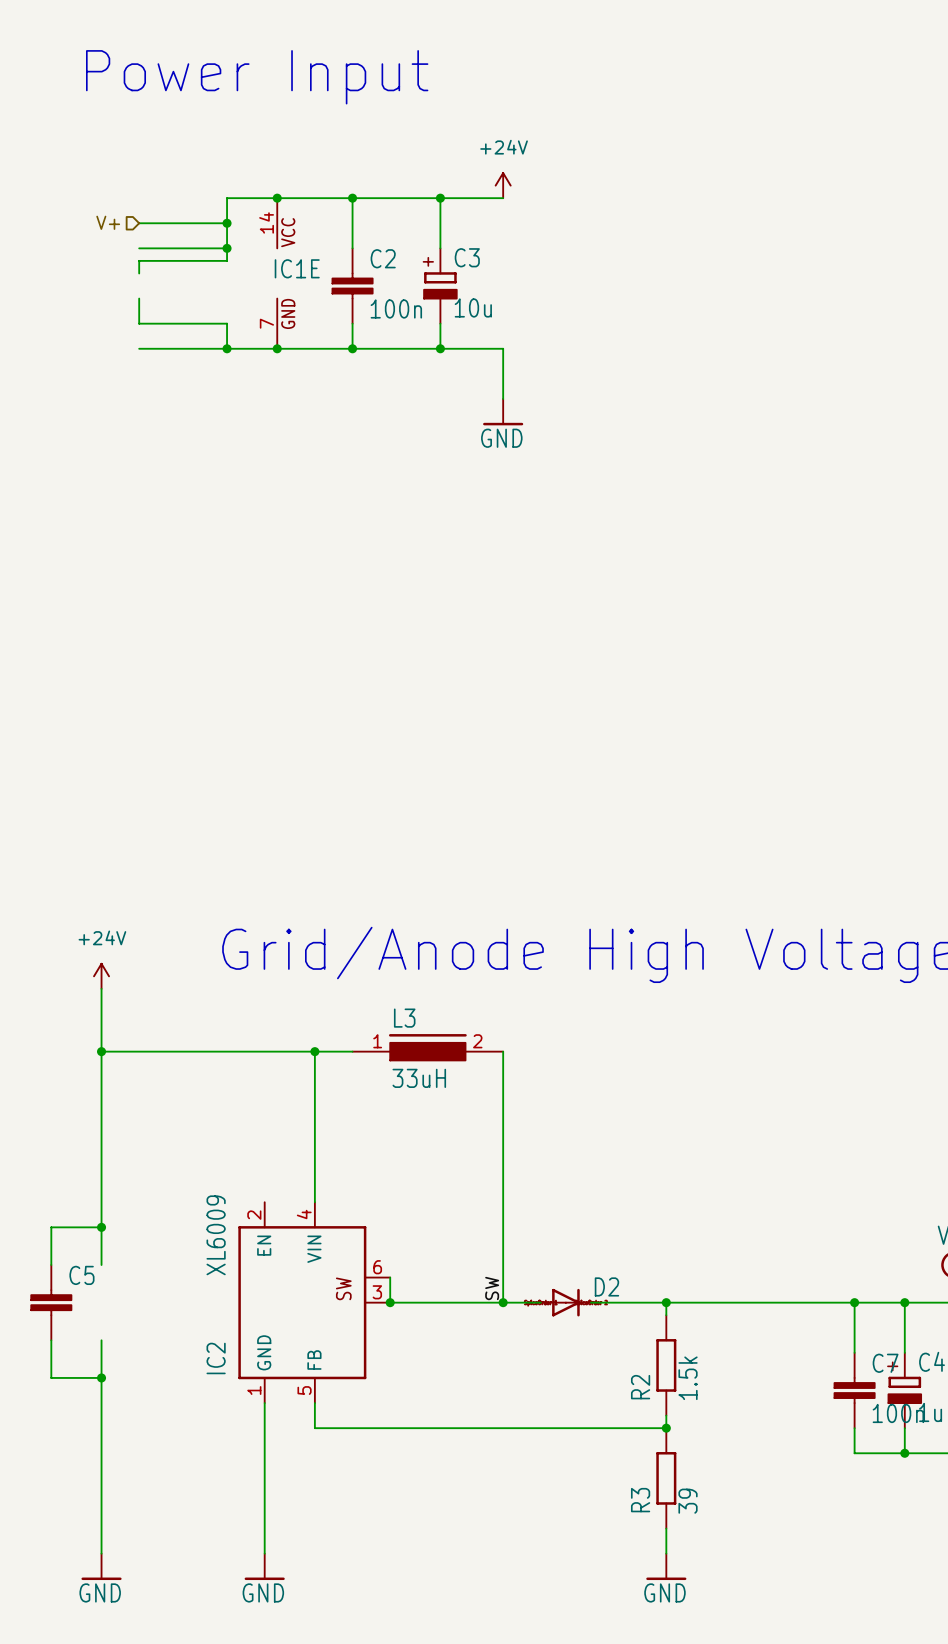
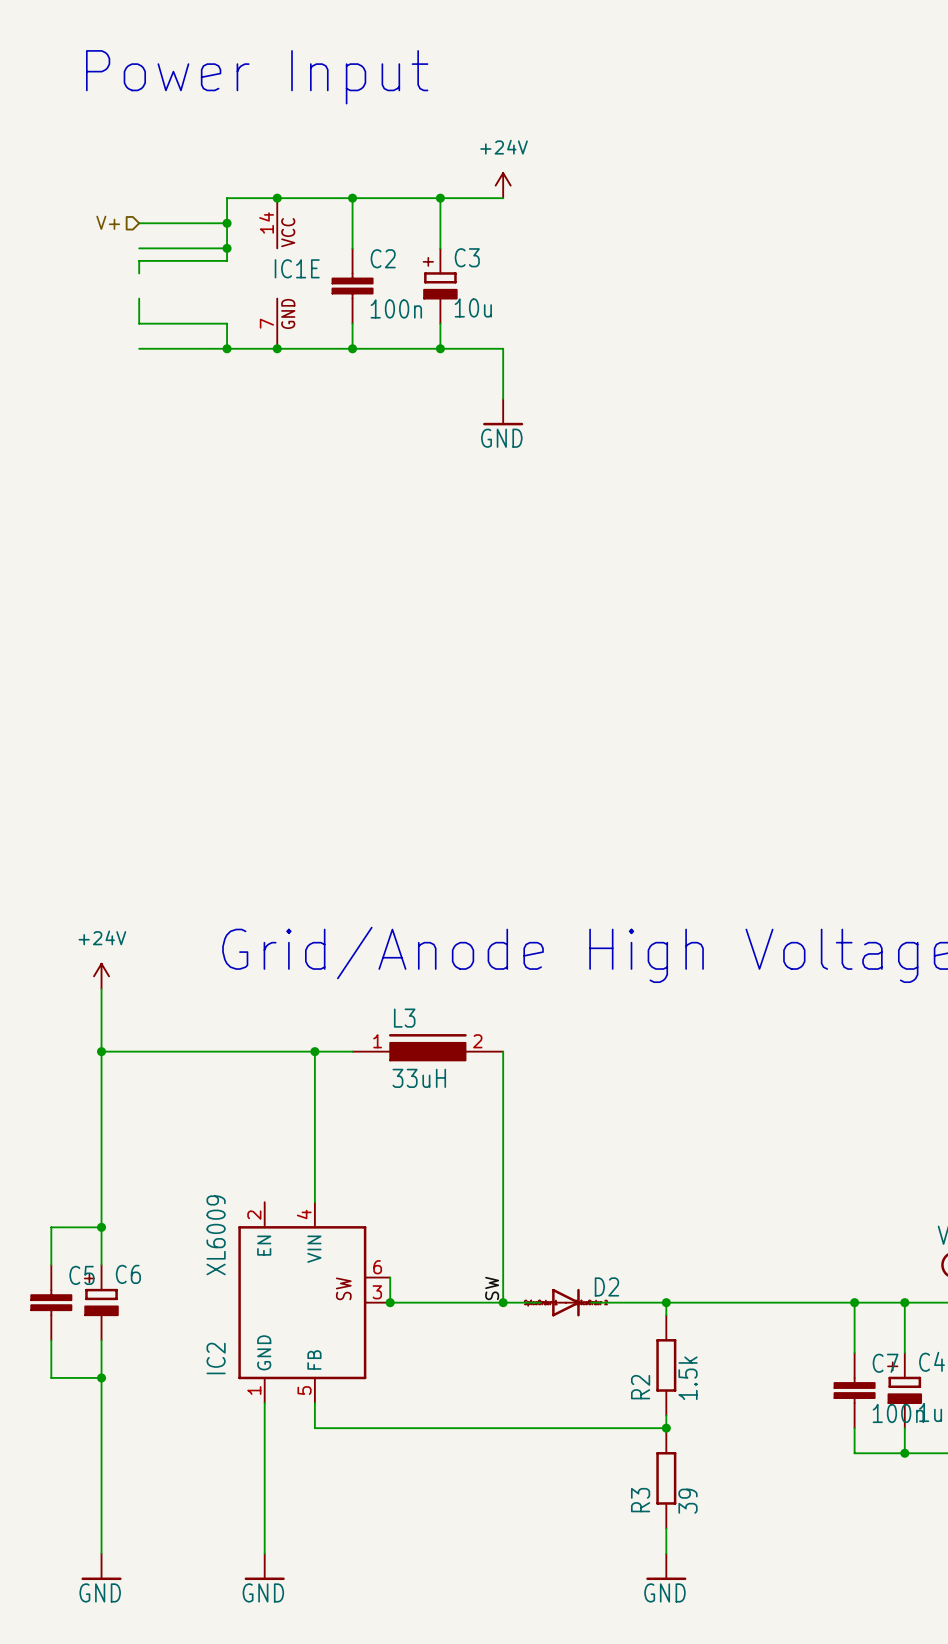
C6: none -> (101, 1302)

